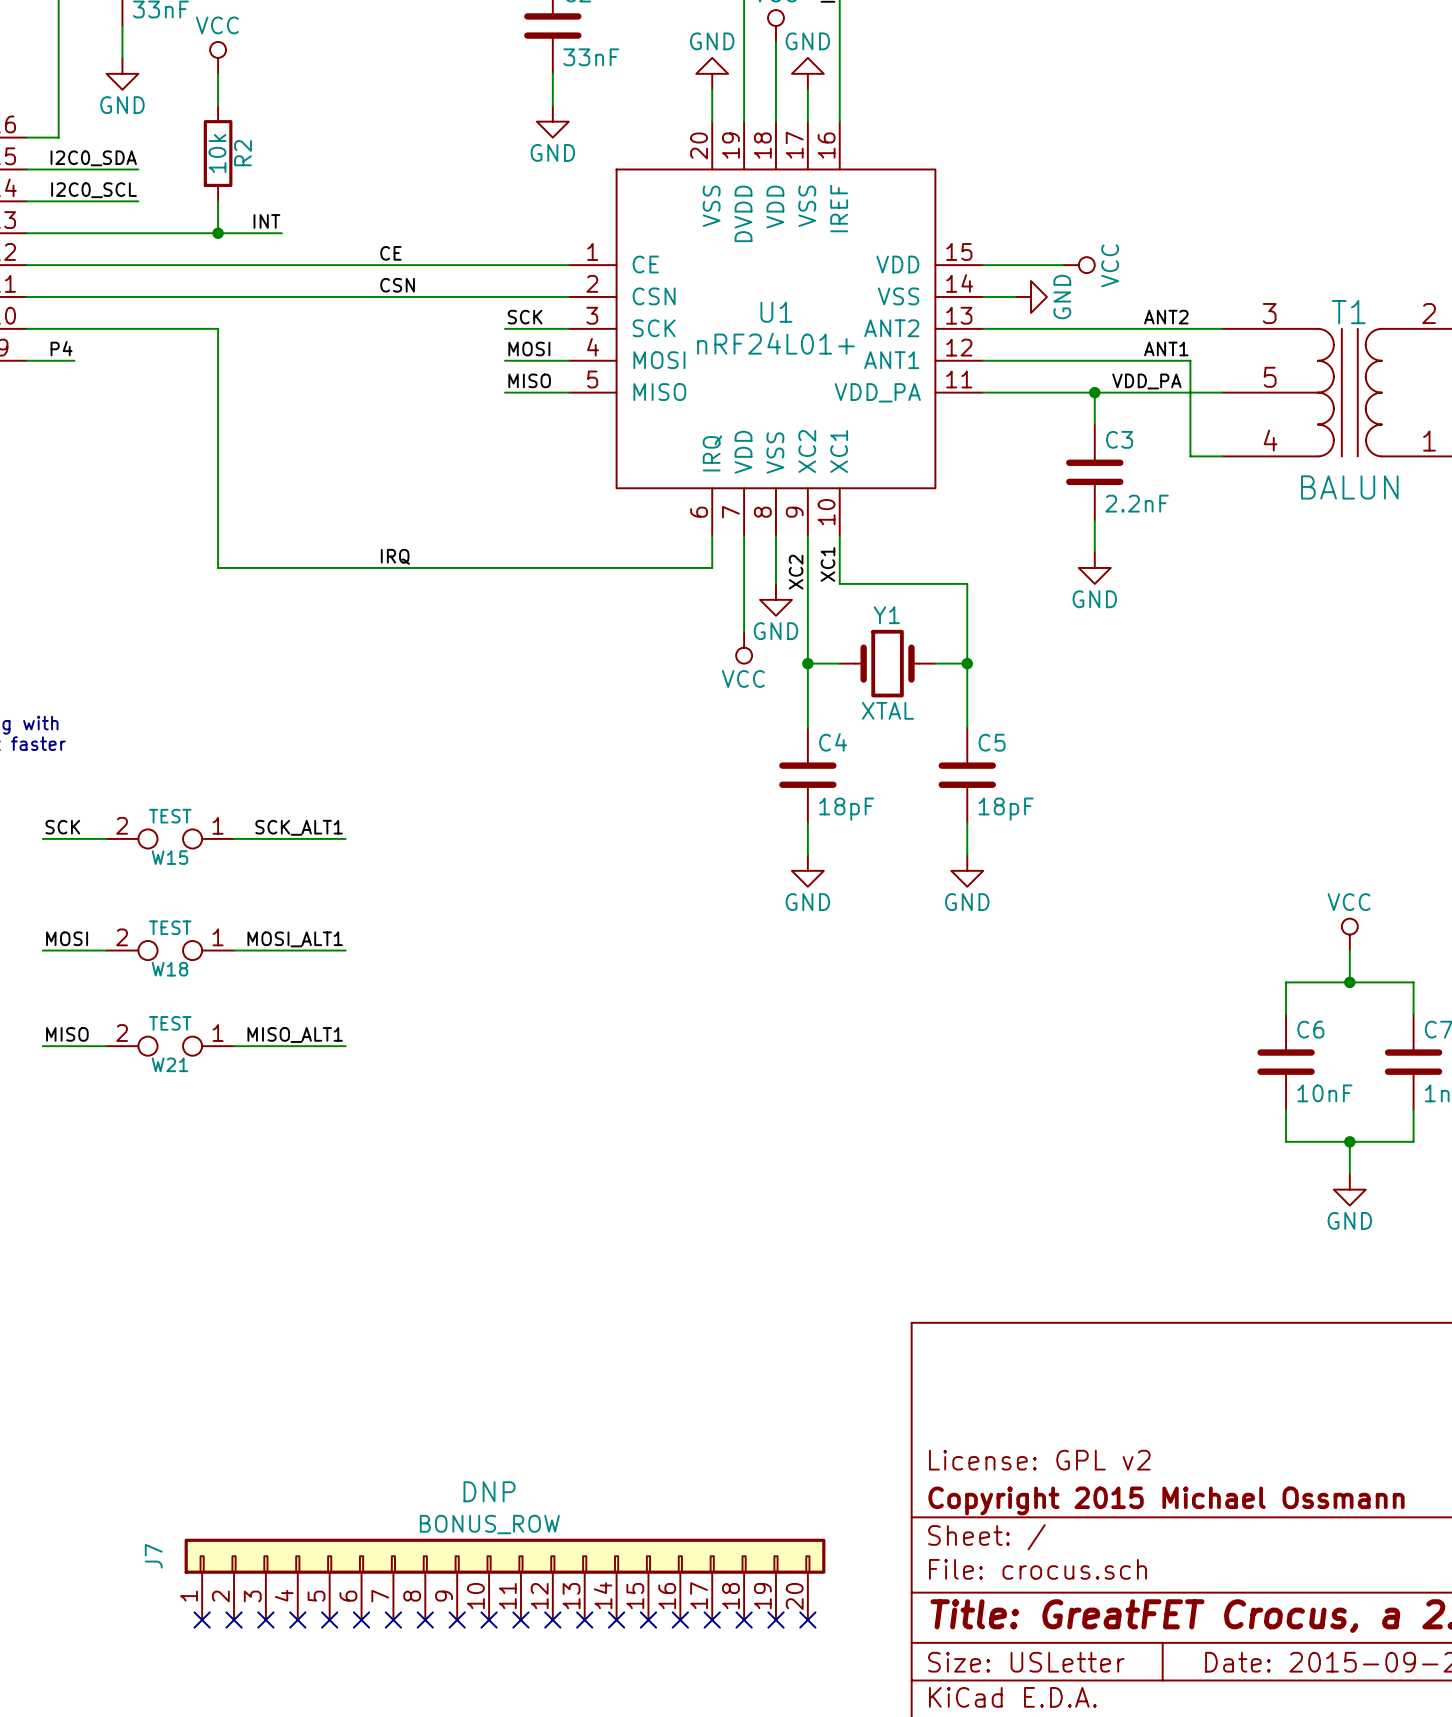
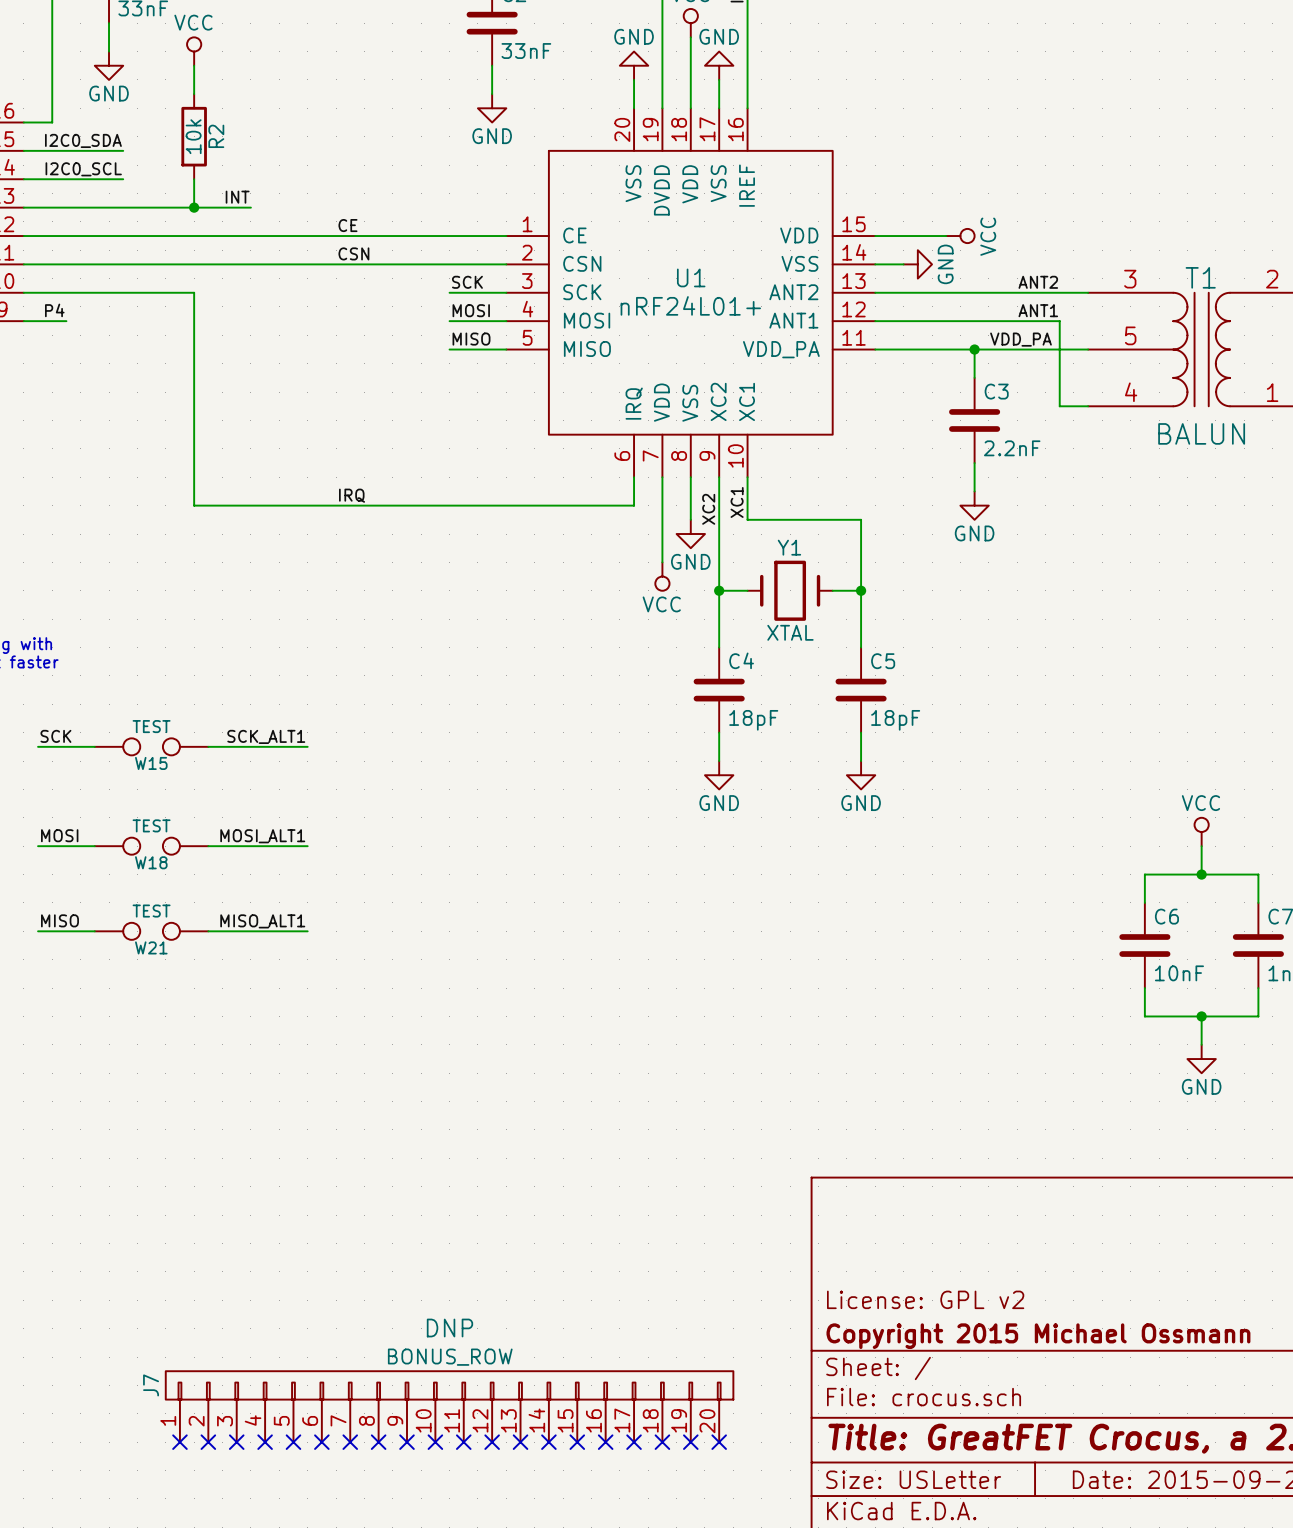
Y1 symbol: [839, 629, 936, 698] -> [747, 560, 833, 621]
W15 pin number: 2 (122, 825) -> none
W15 pin number: 1 (218, 825) -> none
W18 pin number: 2 (122, 937) -> none
W18 pin number: 1 (218, 937) -> none
W21 pin number: 2 (122, 1033) -> none
W21 pin number: 1 (218, 1033) -> none
J7 symbol: [184, 1538, 826, 1621] -> [165, 1371, 734, 1443]

